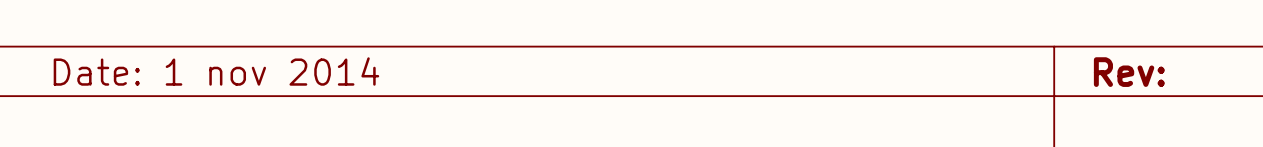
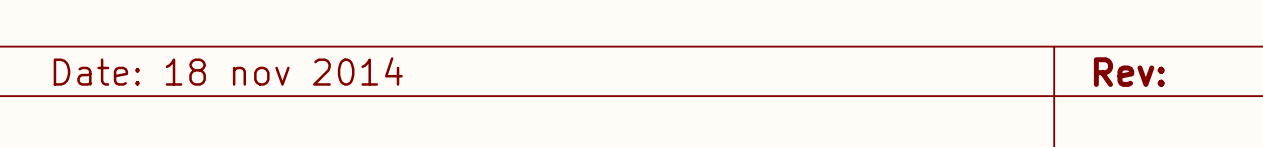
title block: Date: 1 nov 2014 (216, 71) -> Date: 18 nov 2014 (228, 71)

